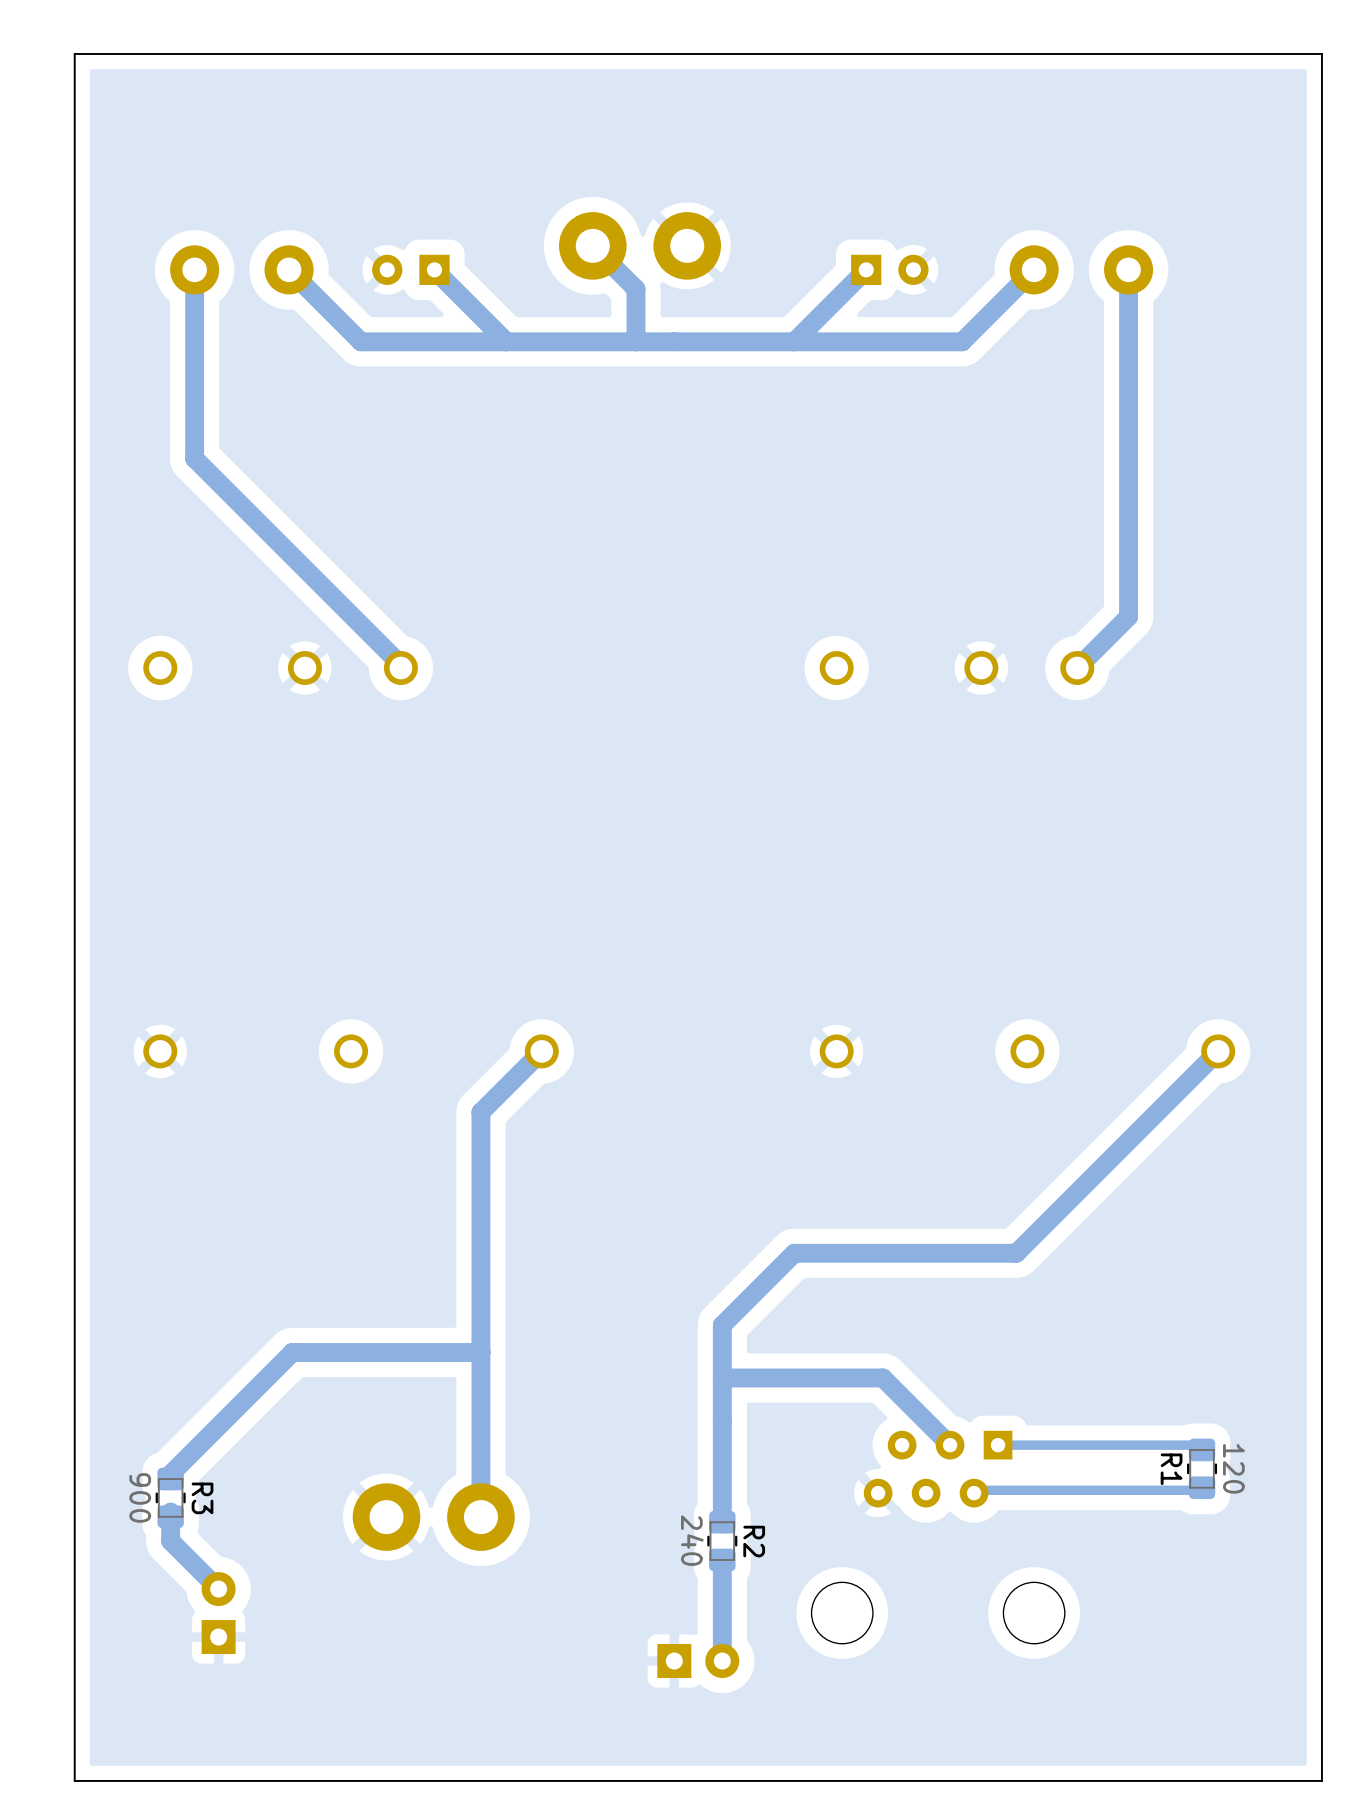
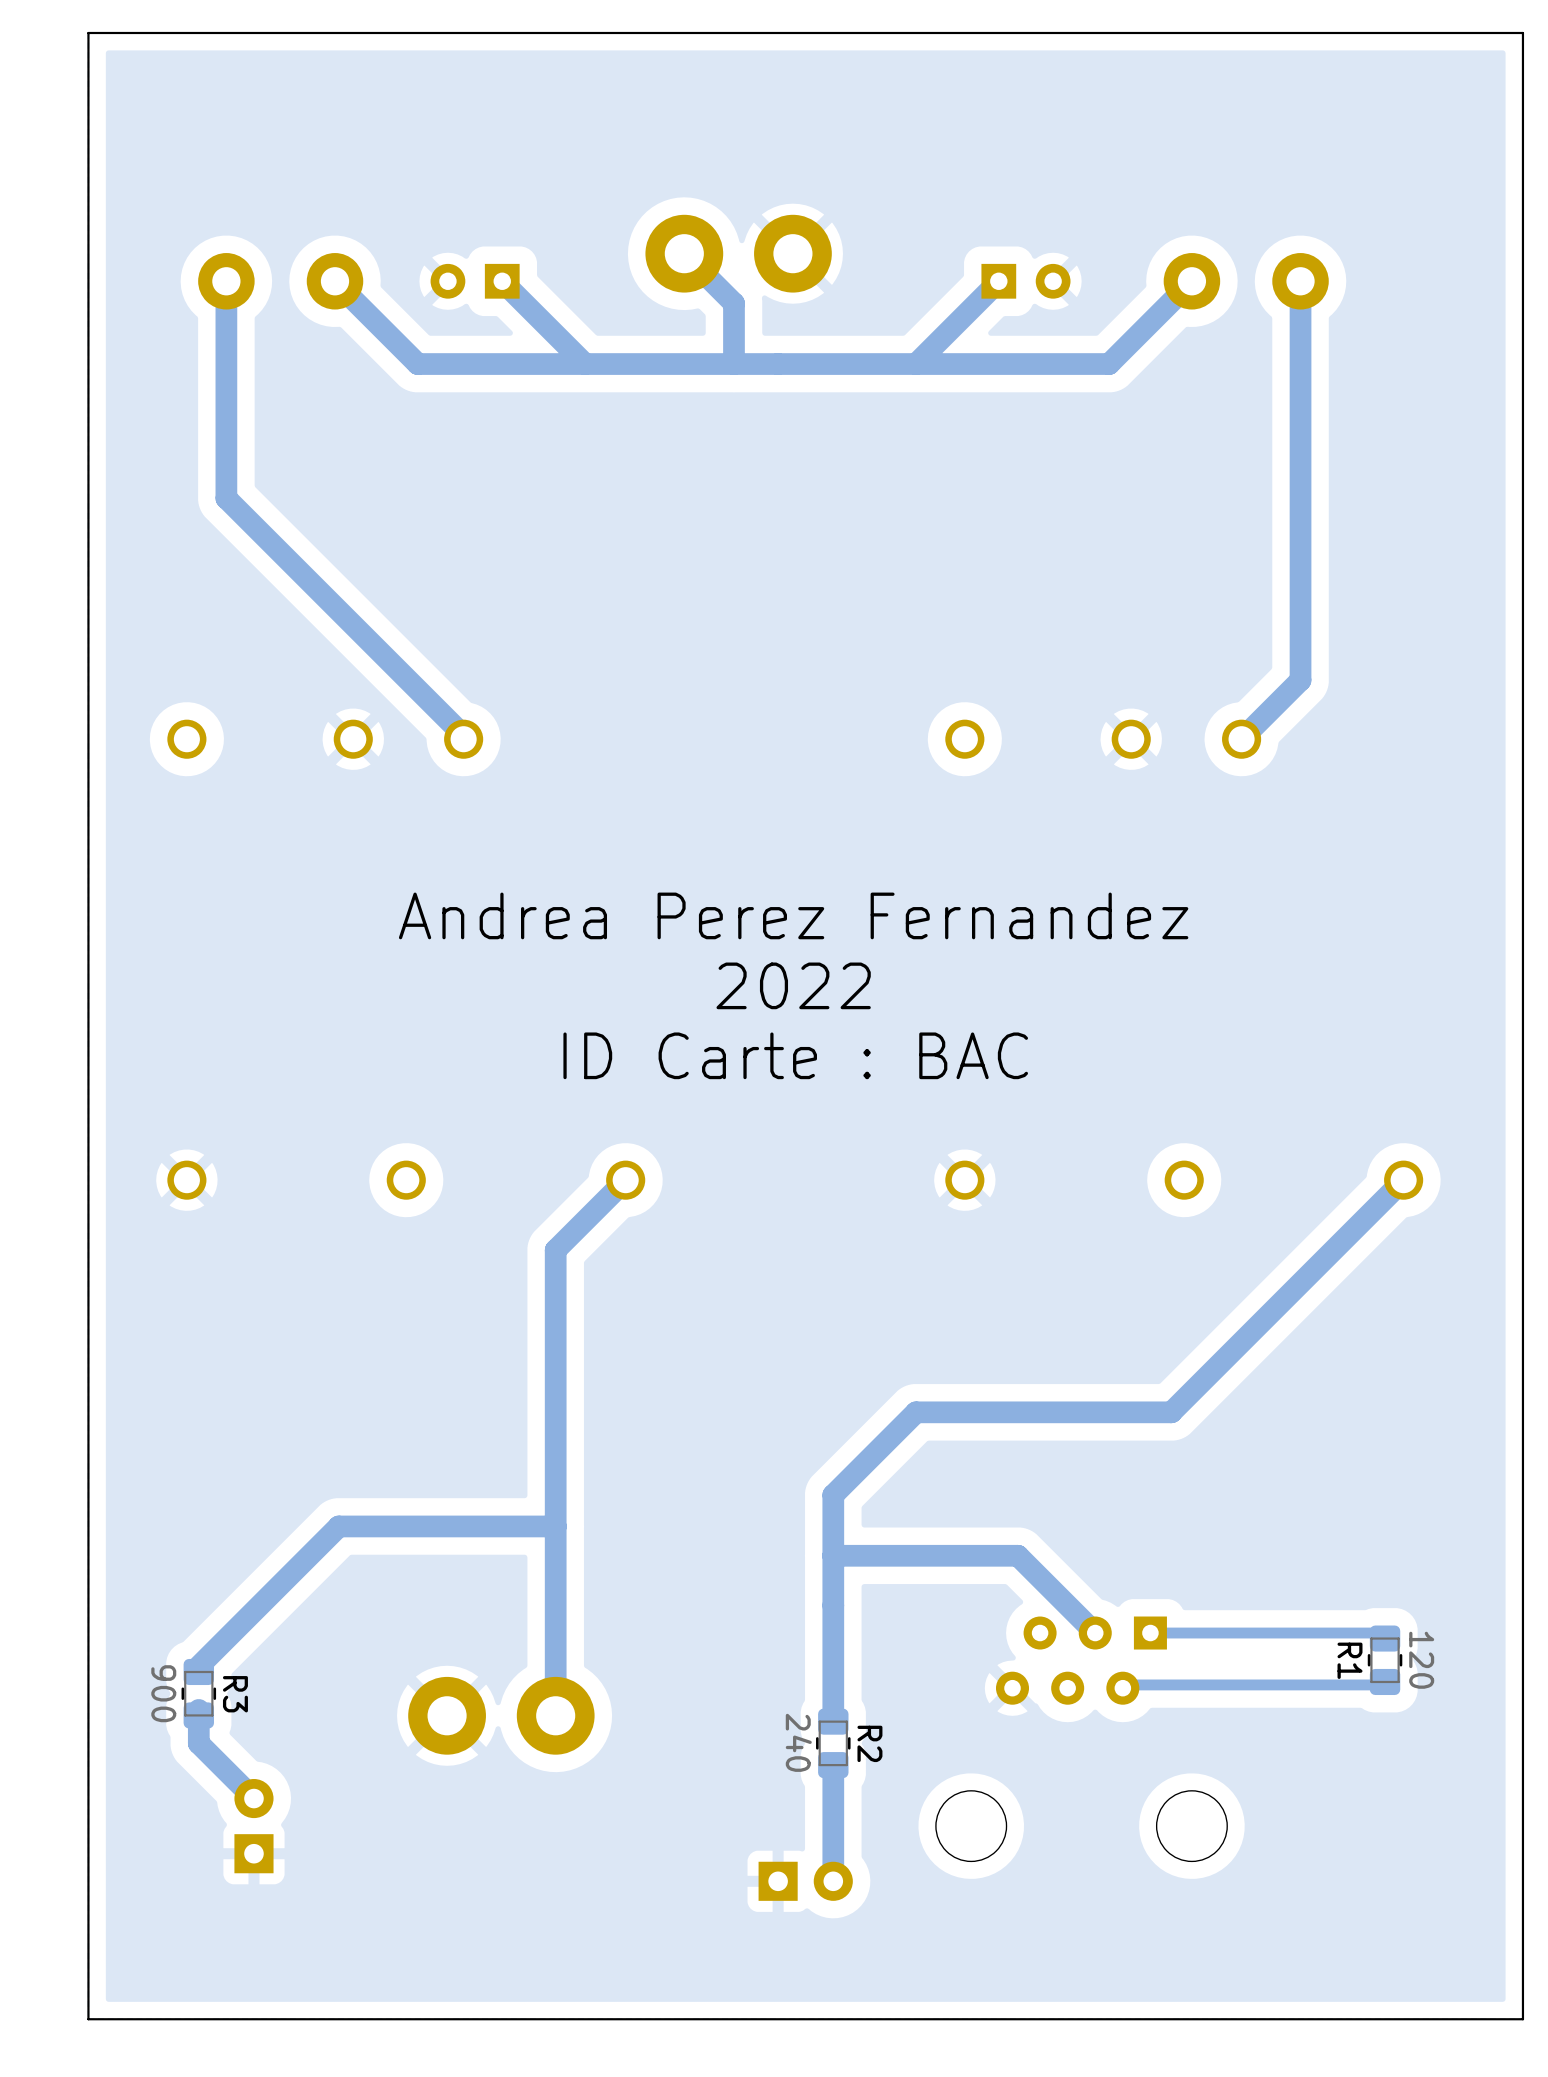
text: none -> Andrea Perez Fernandez (793, 915)
text: none -> 2022 (793, 985)
text: none -> ID Carte : BAC (795, 1055)

